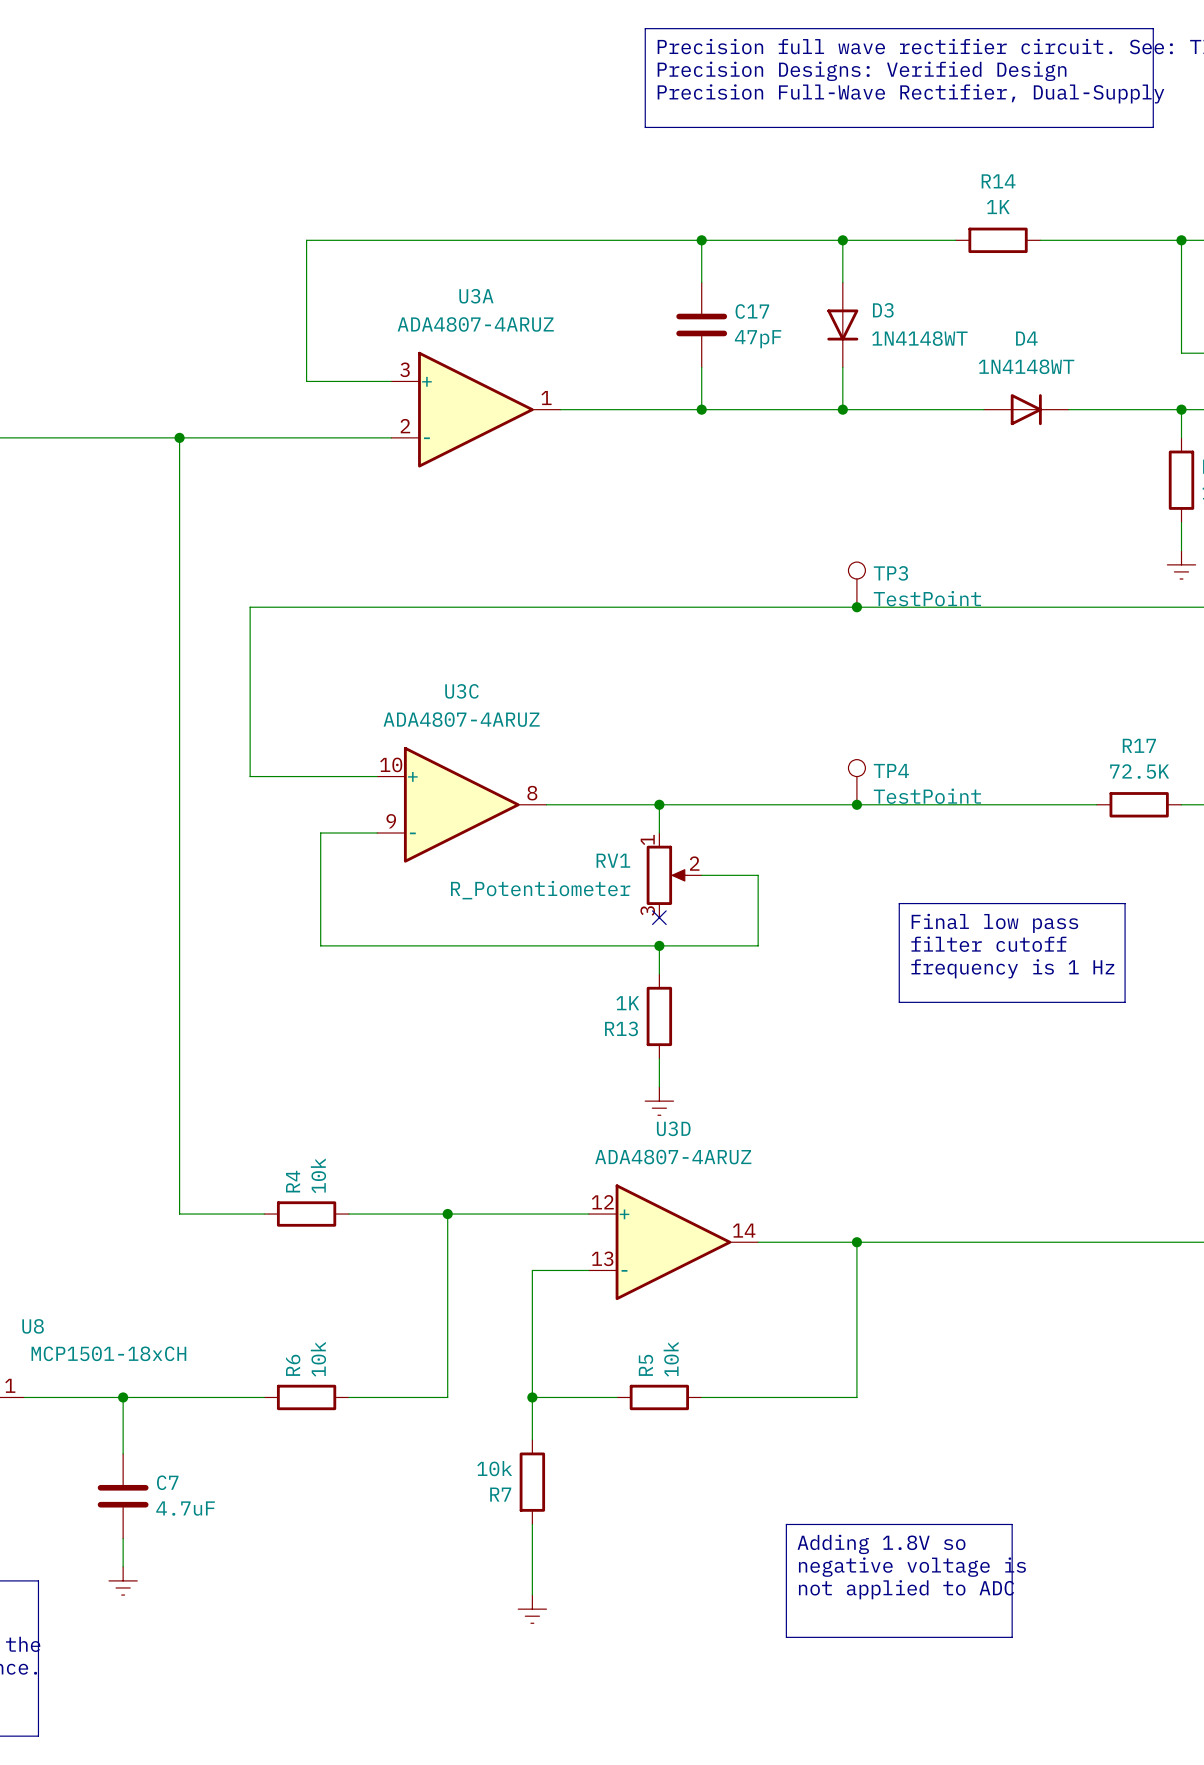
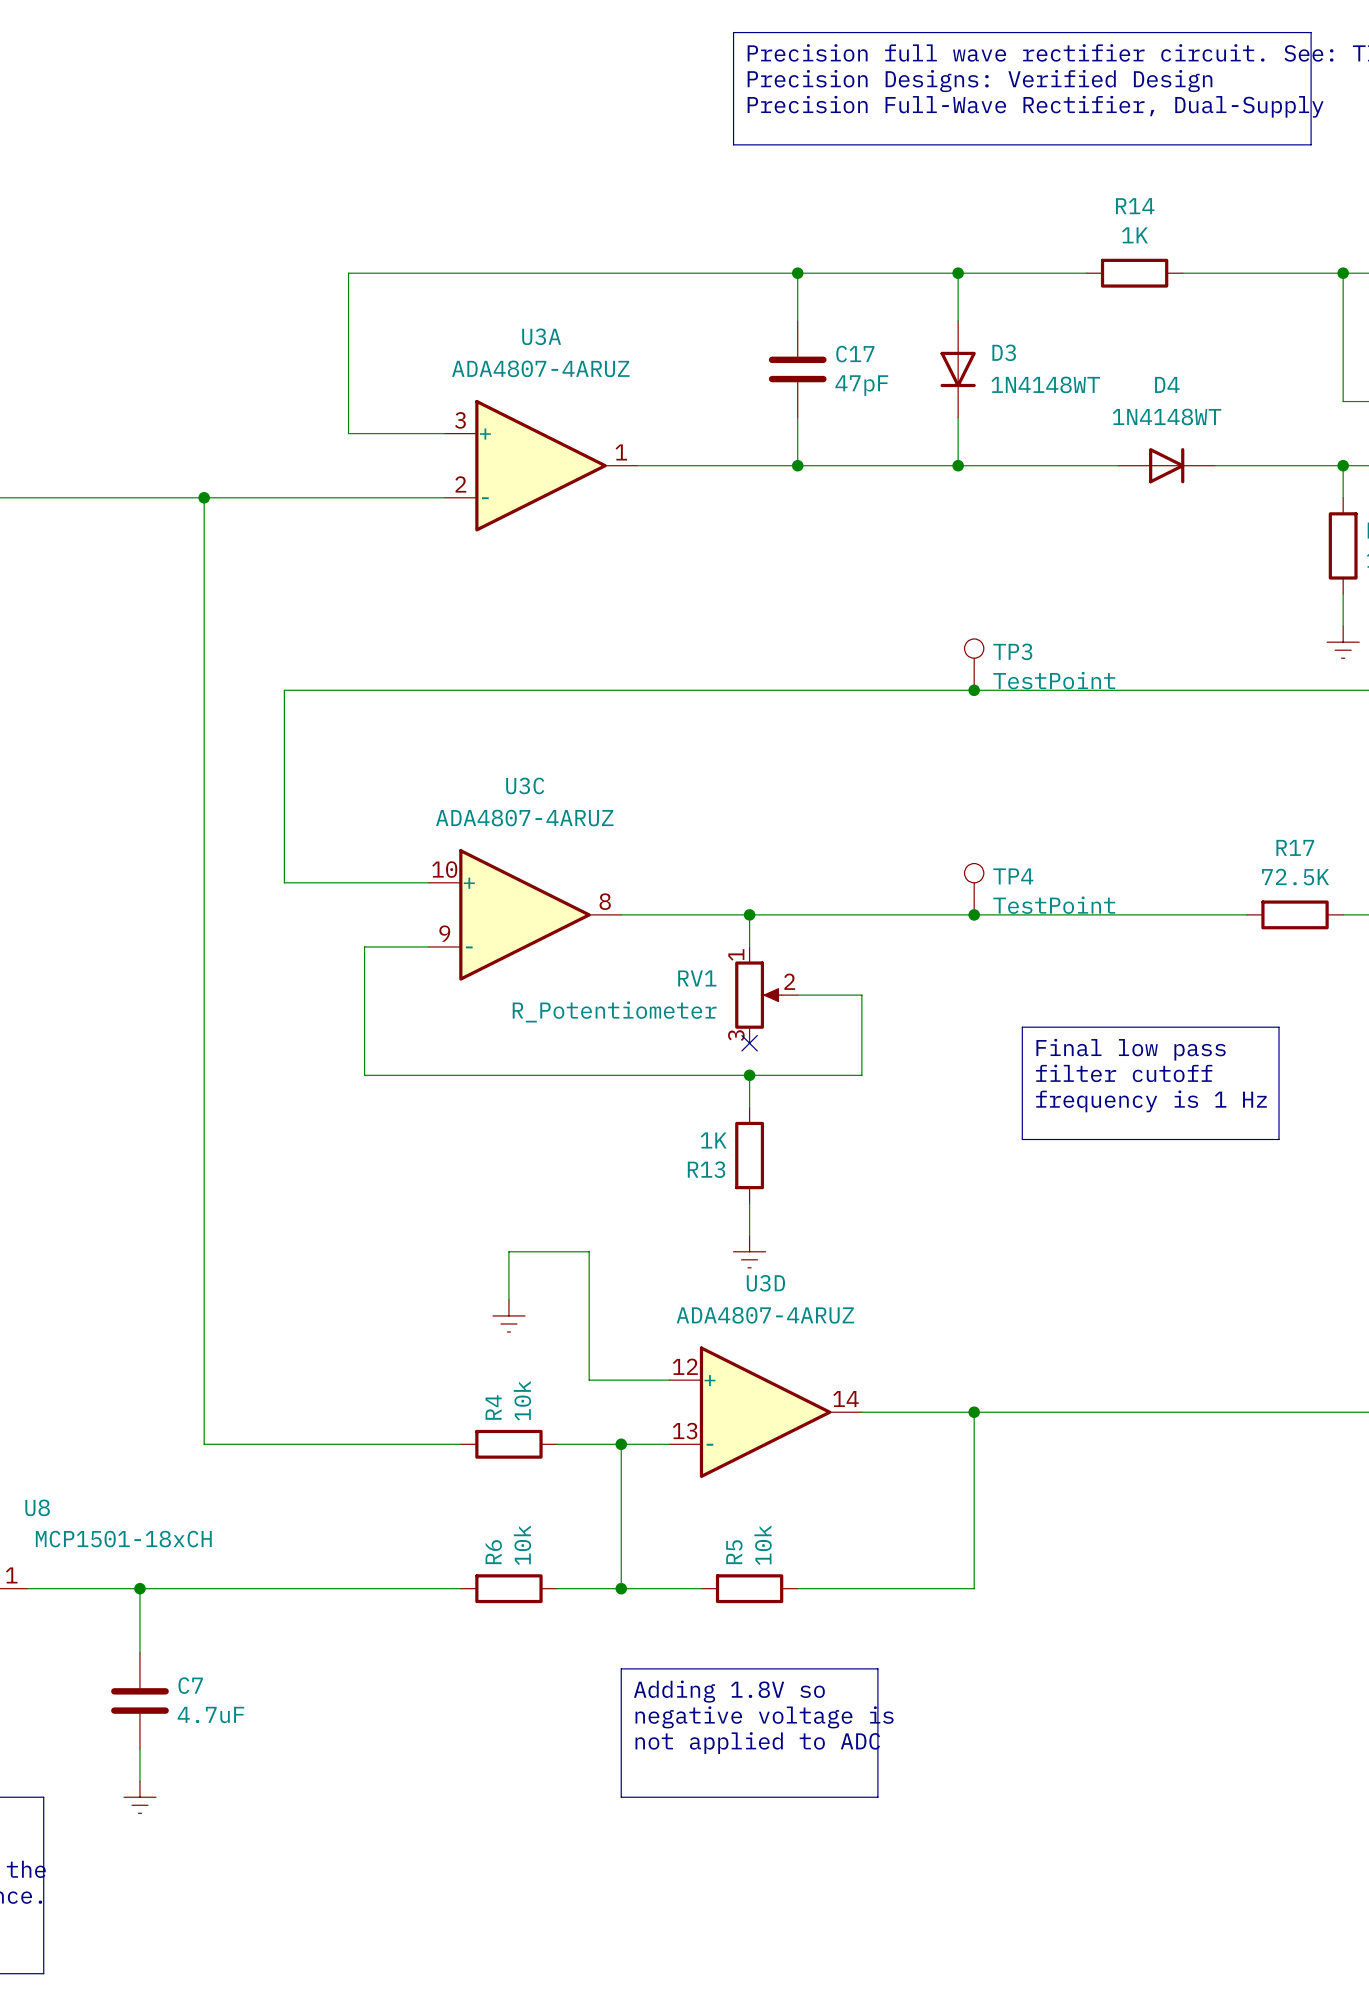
power symbol: none -> (508, 1315)
wire: (179, 1214) (264, 1214) -> (204, 1380) (204, 1444) (460, 1444)
R4 position: (306, 1214) -> (508, 1444)
wire: (348, 1214) (518, 1214) -> (508, 1299) (508, 1251) (589, 1251) (589, 1380)
wire: (447, 1214) (447, 1397) (405, 1397) -> none
junction: (447, 1214) -> none
wire: (532, 1270) (532, 1439) -> (605, 1444) (557, 1444)
wire: none -> (621, 1444) (621, 1588)
junction: none -> (621, 1444)
wire: none -> (300, 1588) (396, 1588)
R6 position: (306, 1397) -> (508, 1588)
wire: none -> (557, 1588) (605, 1588)
junction position: (532, 1397) -> (621, 1588)
R7: 10k (532, 1482) -> none
wire: (532, 1524) (532, 1595) -> none
line: (786, 1524) (1012, 1524) (1012, 1637) (786, 1637) (786, 1524) -> (621, 1668) (877, 1668) (877, 1797) (621, 1797) (621, 1668)
text position: Adding 1.8V so (881, 1544) -> Adding 1.8V so (729, 1691)
text position: negative voltage is (912, 1567) -> negative voltage is (764, 1717)
text position: not applied to ADC (906, 1589) -> not applied to ADC (757, 1743)
power symbol: (532, 1609) -> none

